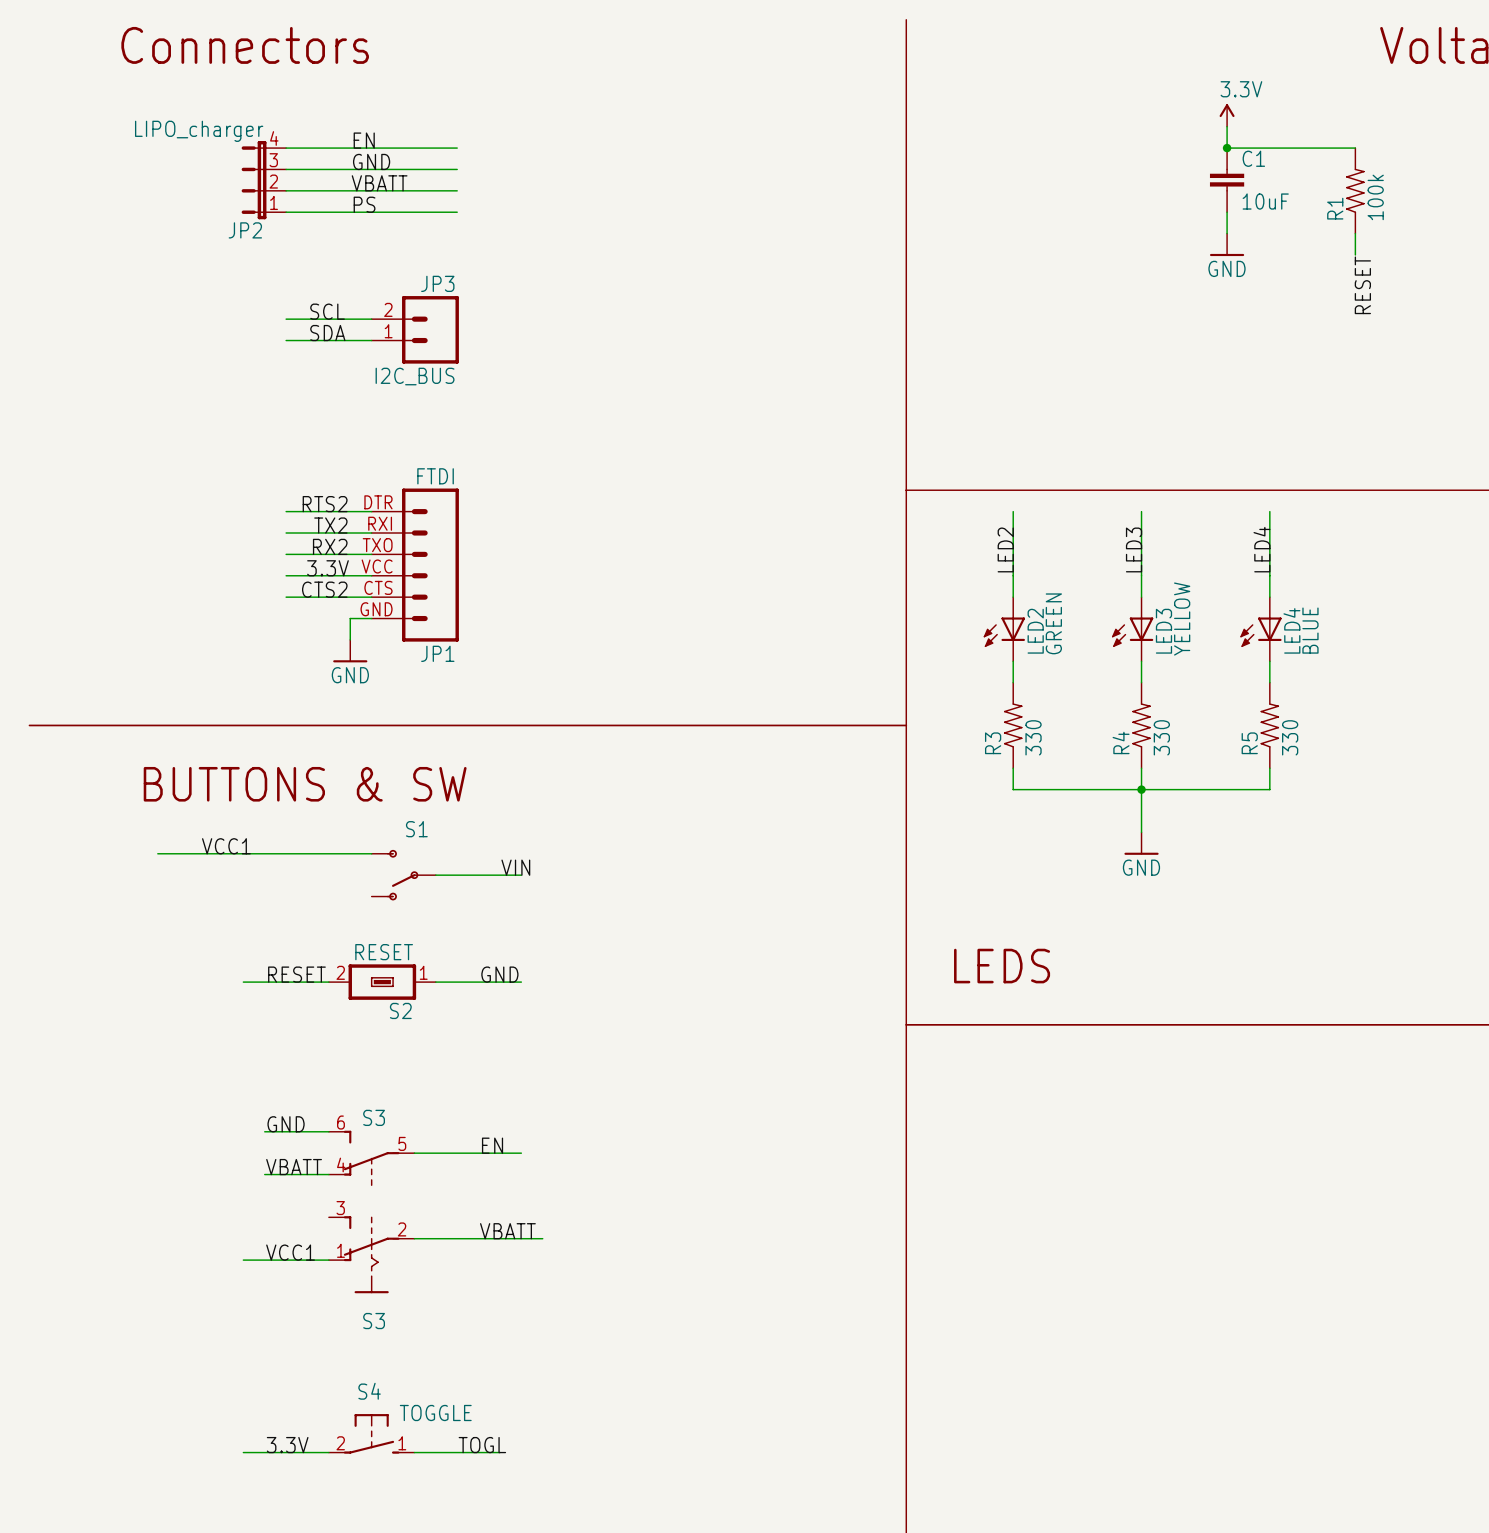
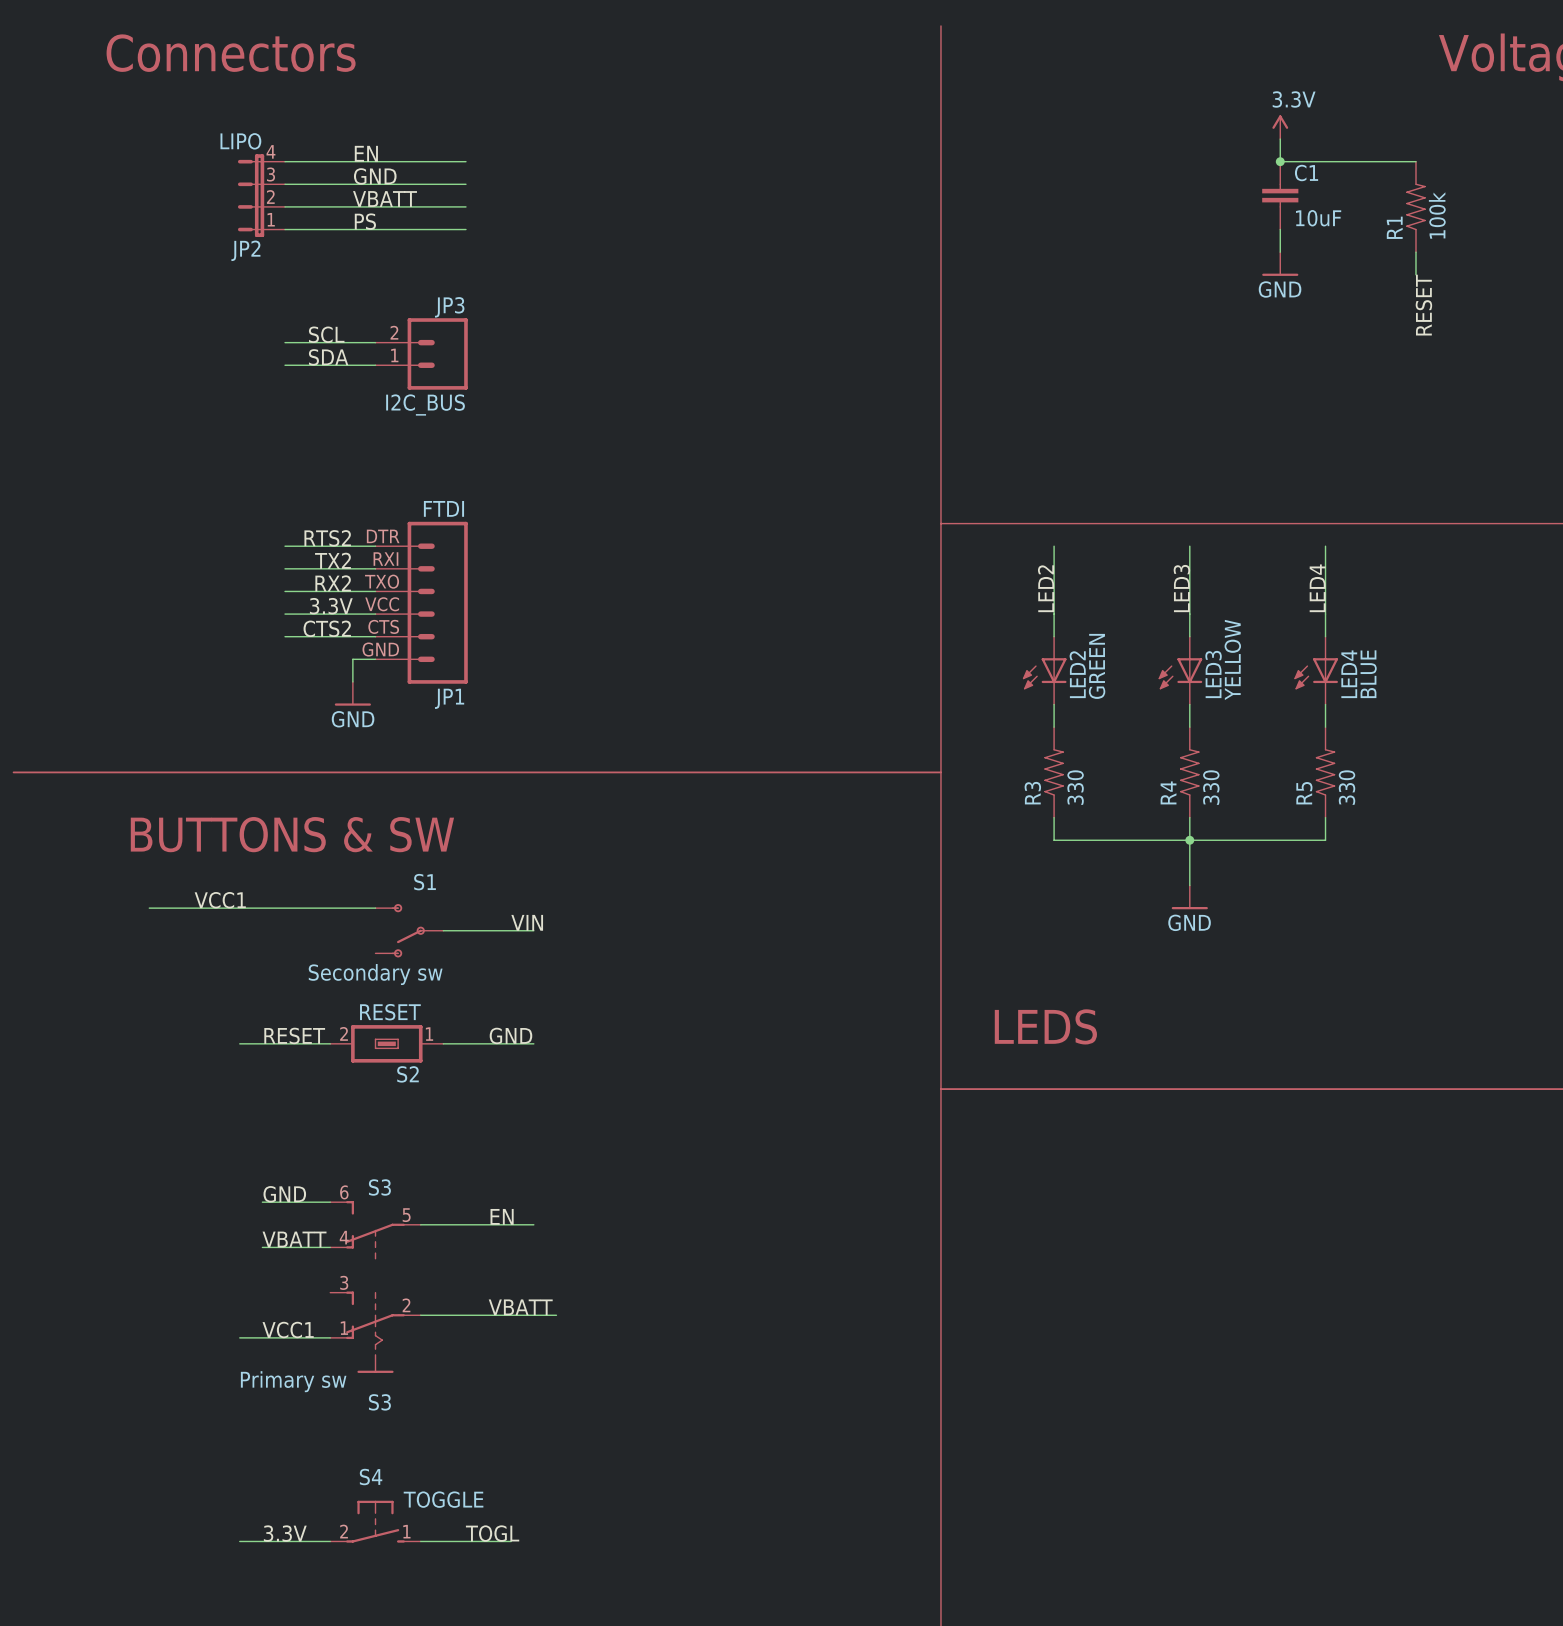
JP2 value: LIPO_charger (199, 131) -> LIPO (240, 141)
S1 value: none -> Secondary sw (375, 974)
S3 value: none -> Primary sw (293, 1381)

